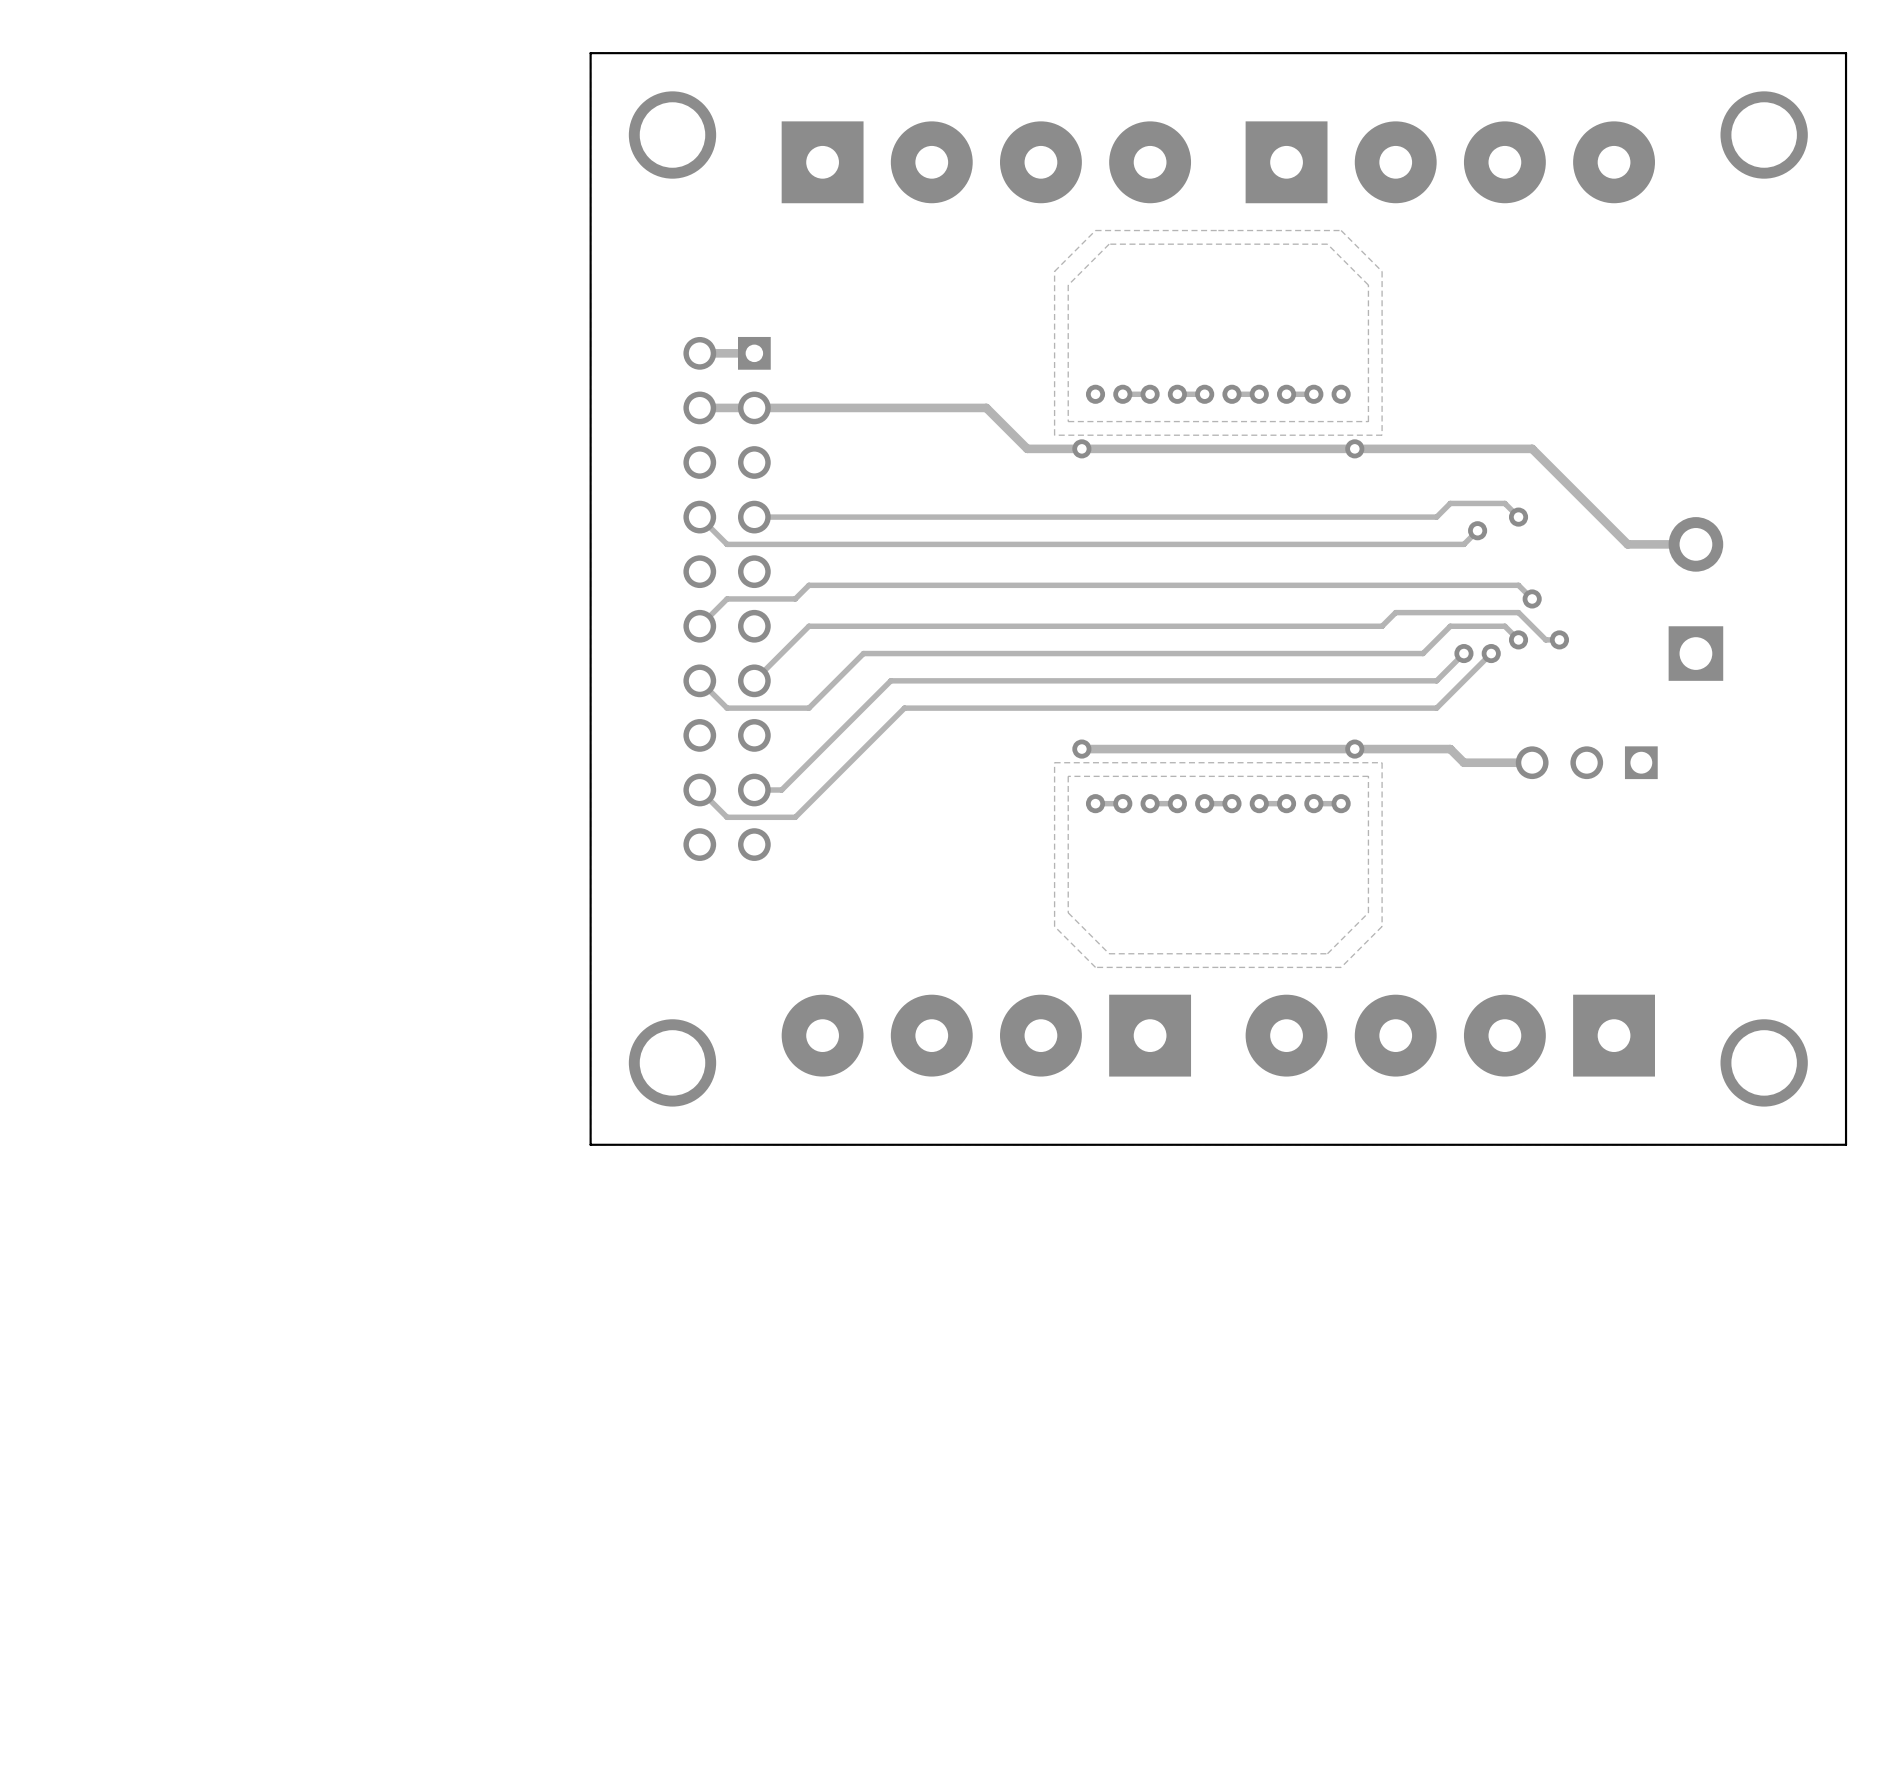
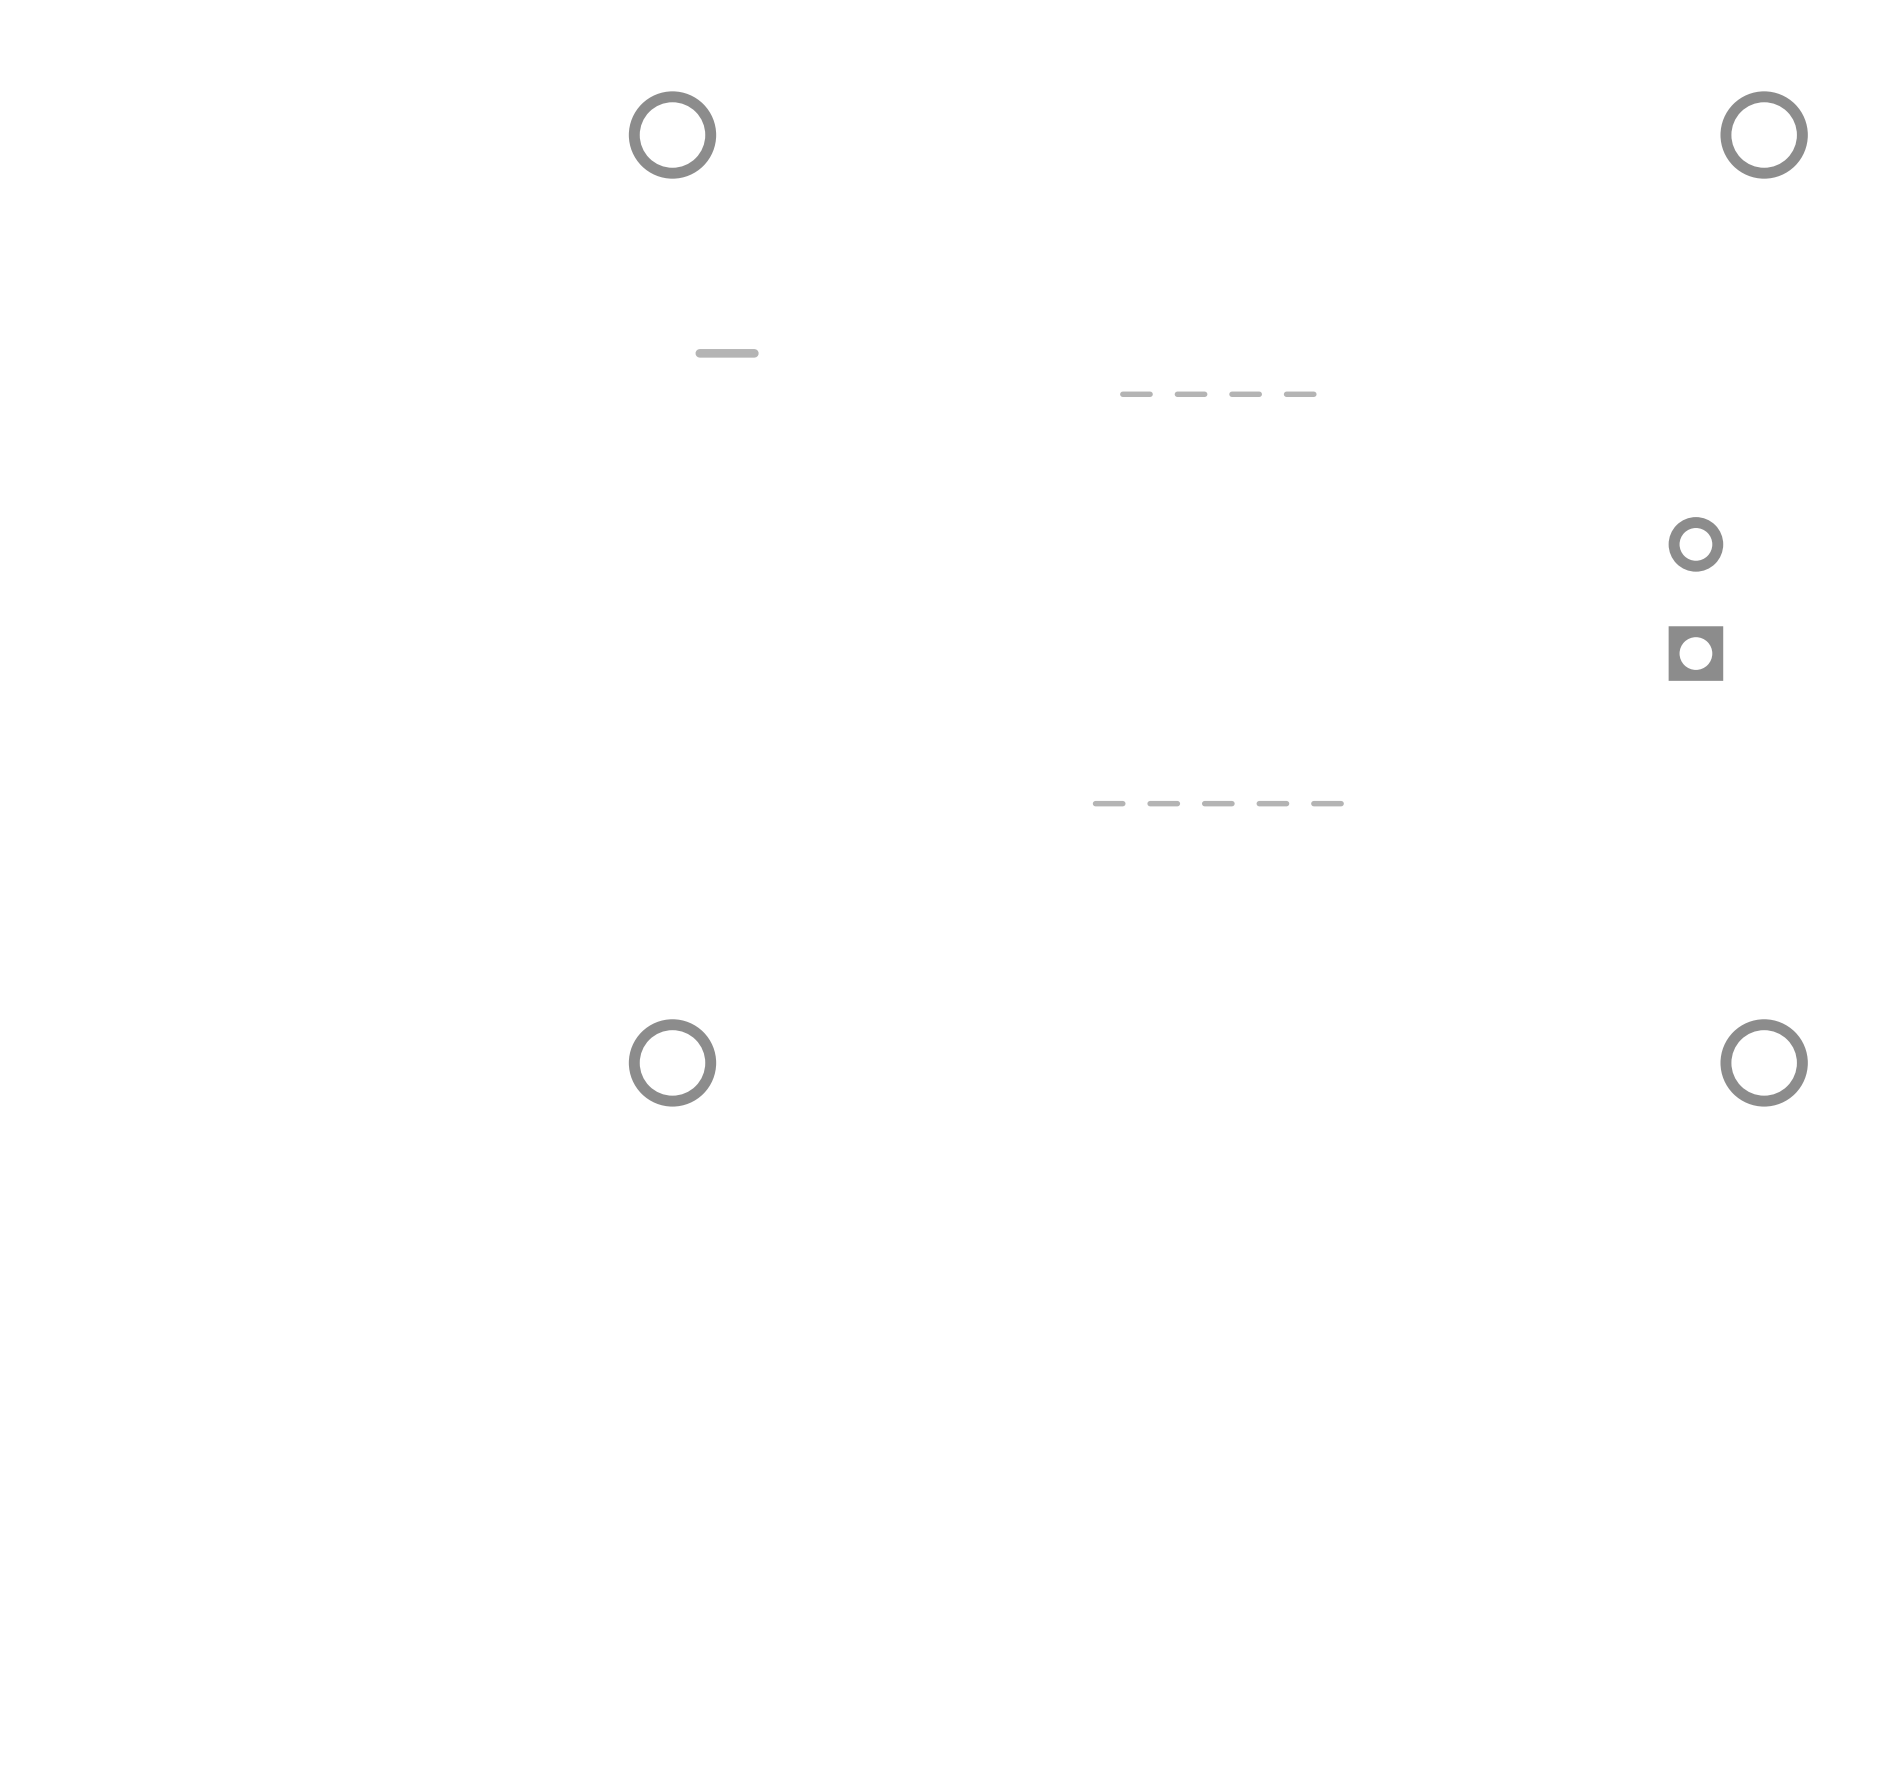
board edge: (1846, 53) (1846, 1144) (590, 1144) (590, 53) (1846, 53) -> none
part: (986, 162) -> none
part: (1450, 162) -> none
zone outline: (1341, 230) (1095, 230) (1054, 271) (1054, 435) (1382, 435) (1382, 271) (1341, 230) -> none
zone outline: (1327, 244) (1368, 285) (1368, 421) (1068, 421) (1068, 285) (1109, 244) (1327, 244) -> none
via: (1095, 394) -> none
via: (1122, 394) -> none
via: (1150, 394) -> none
via: (1177, 394) -> none
via: (1204, 394) -> none
via: (1231, 394) -> none
via: (1259, 394) -> none
via: (1286, 394) -> none
via: (1313, 394) -> none
via: (1341, 394) -> none
track: (699, 407) (986, 407) (1027, 448) (1532, 448) (1627, 544) (1695, 544) -> none
via: (1081, 448) -> none
via: (1354, 448) -> none
track: (699, 517) (727, 544) (1463, 544) (1477, 530) -> none
track: (1518, 517) (1504, 503) (1450, 503) (1436, 517) (754, 517) -> none
via: (1518, 517) -> none
via: (1477, 530) -> none
part: (727, 598) -> none
track: (1532, 598) (1518, 585) (808, 585) (795, 598) (727, 598) (699, 626) -> none
via: (1532, 598) -> none
track: (1518, 639) (1504, 626) (1450, 626) (1423, 653) (863, 653) (808, 708) (727, 708) (699, 680) -> none
via: (1518, 639) -> none
track: (1559, 639) (1545, 639) (1518, 612) (1395, 612) (1382, 626) (808, 626) (754, 680) -> none
via: (1559, 639) -> none
track: (1463, 653) (1436, 680) (890, 680) (781, 790) (754, 790) -> none
via: (1463, 653) -> none
track: (1491, 653) (1436, 708) (904, 708) (795, 817) (727, 817) (699, 790) -> none
via: (1491, 653) -> none
track: (1081, 749) (1450, 749) (1463, 762) (1532, 762) -> none
via: (1081, 749) -> none
via: (1354, 749) -> none
zone outline: (1382, 762) (1054, 762) (1054, 926) (1095, 967) (1341, 967) (1382, 926) (1382, 762) -> none
part: (1586, 762) -> none
zone outline: (1368, 776) (1368, 912) (1327, 953) (1109, 953) (1068, 912) (1068, 776) (1368, 776) -> none
via: (1095, 803) -> none
via: (1122, 803) -> none
via: (1150, 803) -> none
via: (1177, 803) -> none
via: (1204, 803) -> none
via: (1231, 803) -> none
via: (1259, 803) -> none
via: (1286, 803) -> none
via: (1313, 803) -> none
via: (1341, 803) -> none
part: (986, 1035) -> none
part: (1450, 1035) -> none

